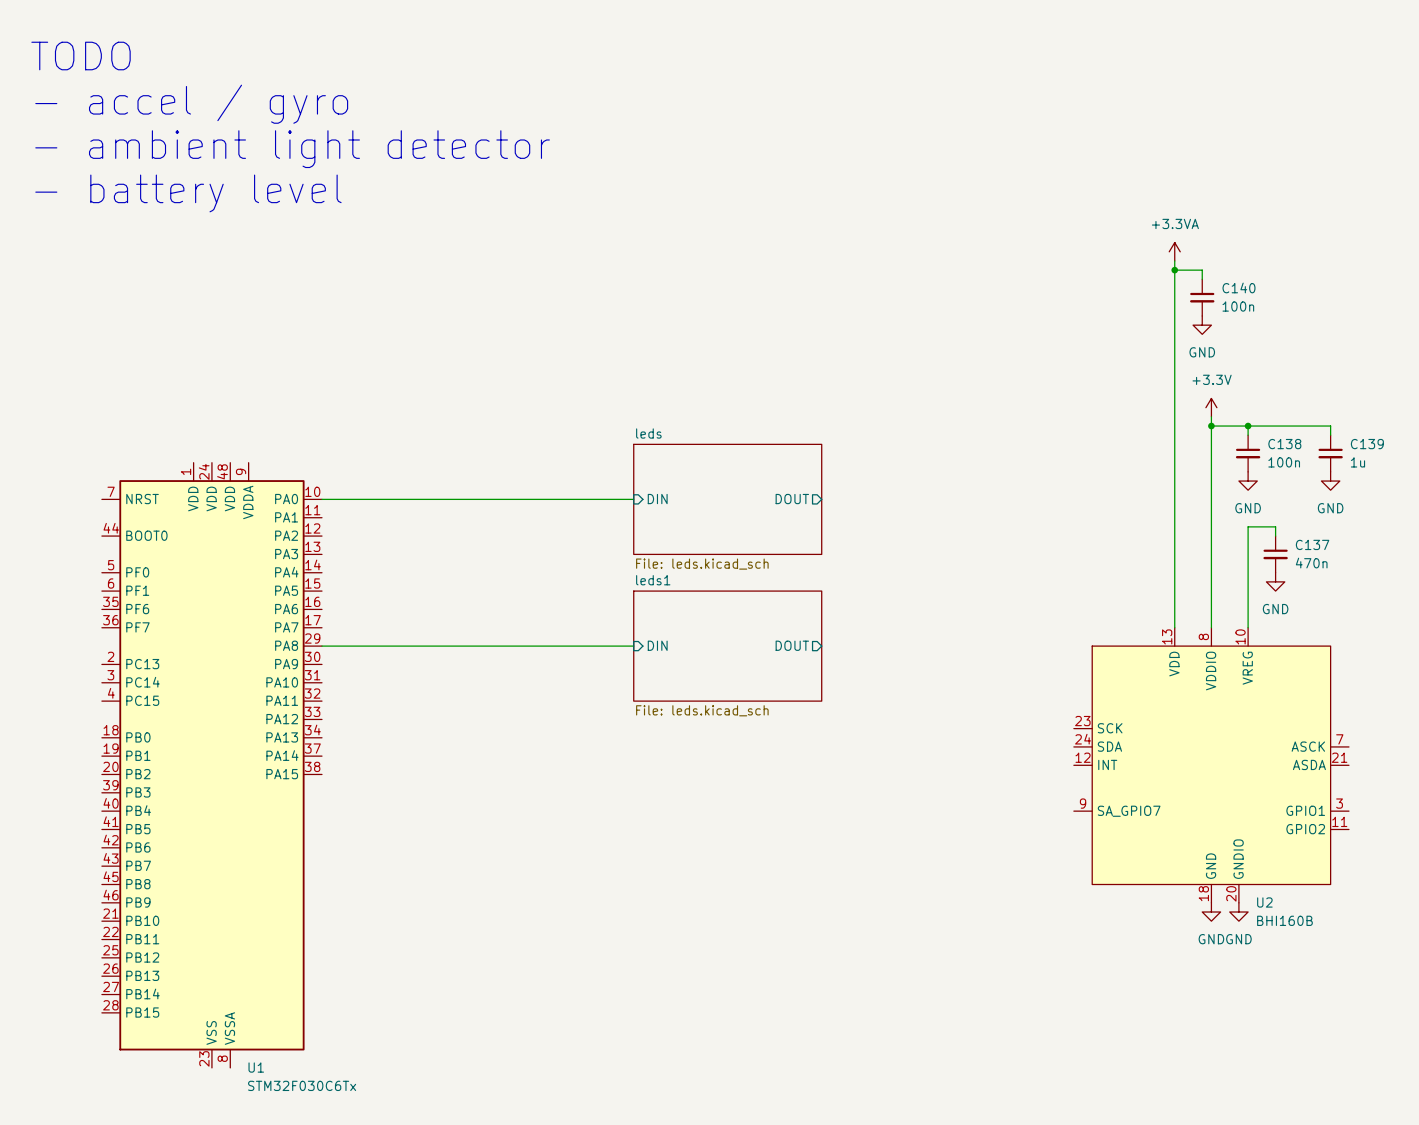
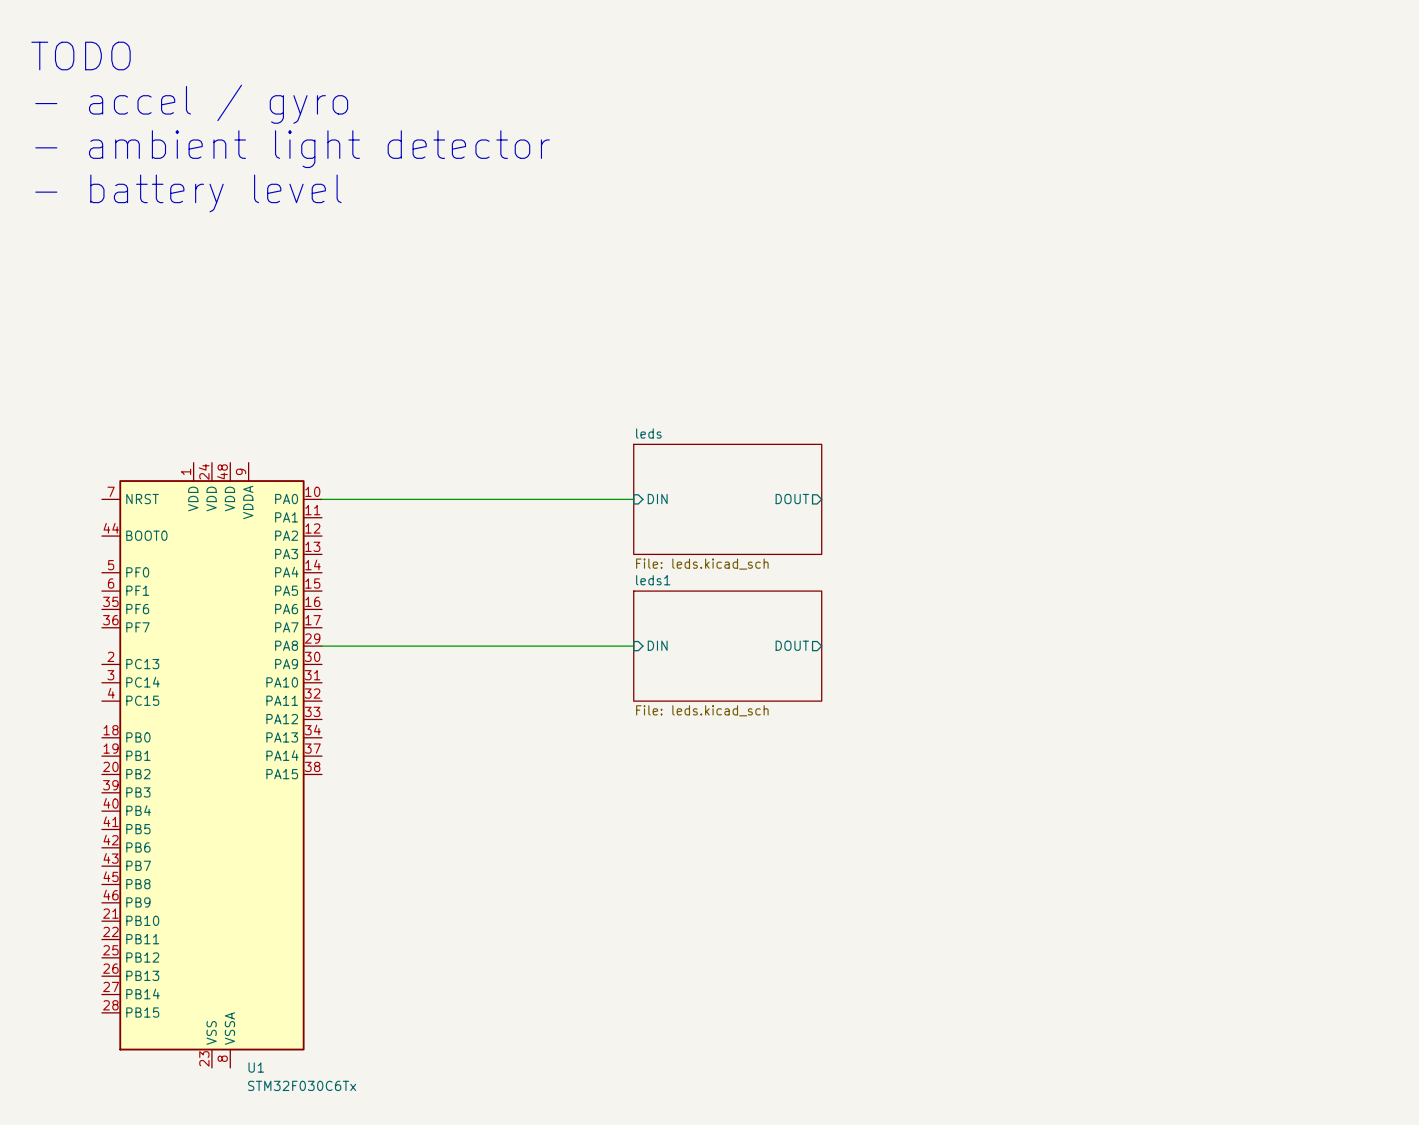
power symbol: +3.3VA (1174, 251) -> none
wire: (1174, 260) (1174, 627) -> none
wire: (1174, 270) (1202, 270) (1202, 279) -> none
junction: (1174, 270) -> none
C140: 100n (1202, 297) -> none
power symbol: GND (1202, 325) -> none
power symbol: +3.3V (1211, 407) -> none
wire: (1211, 416) (1211, 627) -> none
wire: (1211, 426) (1330, 426) (1330, 435) -> none
junction: (1211, 426) -> none
wire: (1248, 426) (1248, 435) -> none
junction: (1248, 426) -> none
C138: 100n (1248, 453) -> none
C139: 1u (1330, 453) -> none
power symbol: GND (1248, 481) -> none
power symbol: GND (1330, 481) -> none
wire: (1275, 536) (1275, 526) (1248, 526) (1248, 627) -> none
C137: 470n (1275, 554) -> none
power symbol: GND (1275, 581) -> none
U2: BHI160B (1211, 765) -> none
power symbol: GND (1211, 912) -> none
power symbol: GND (1238, 912) -> none

